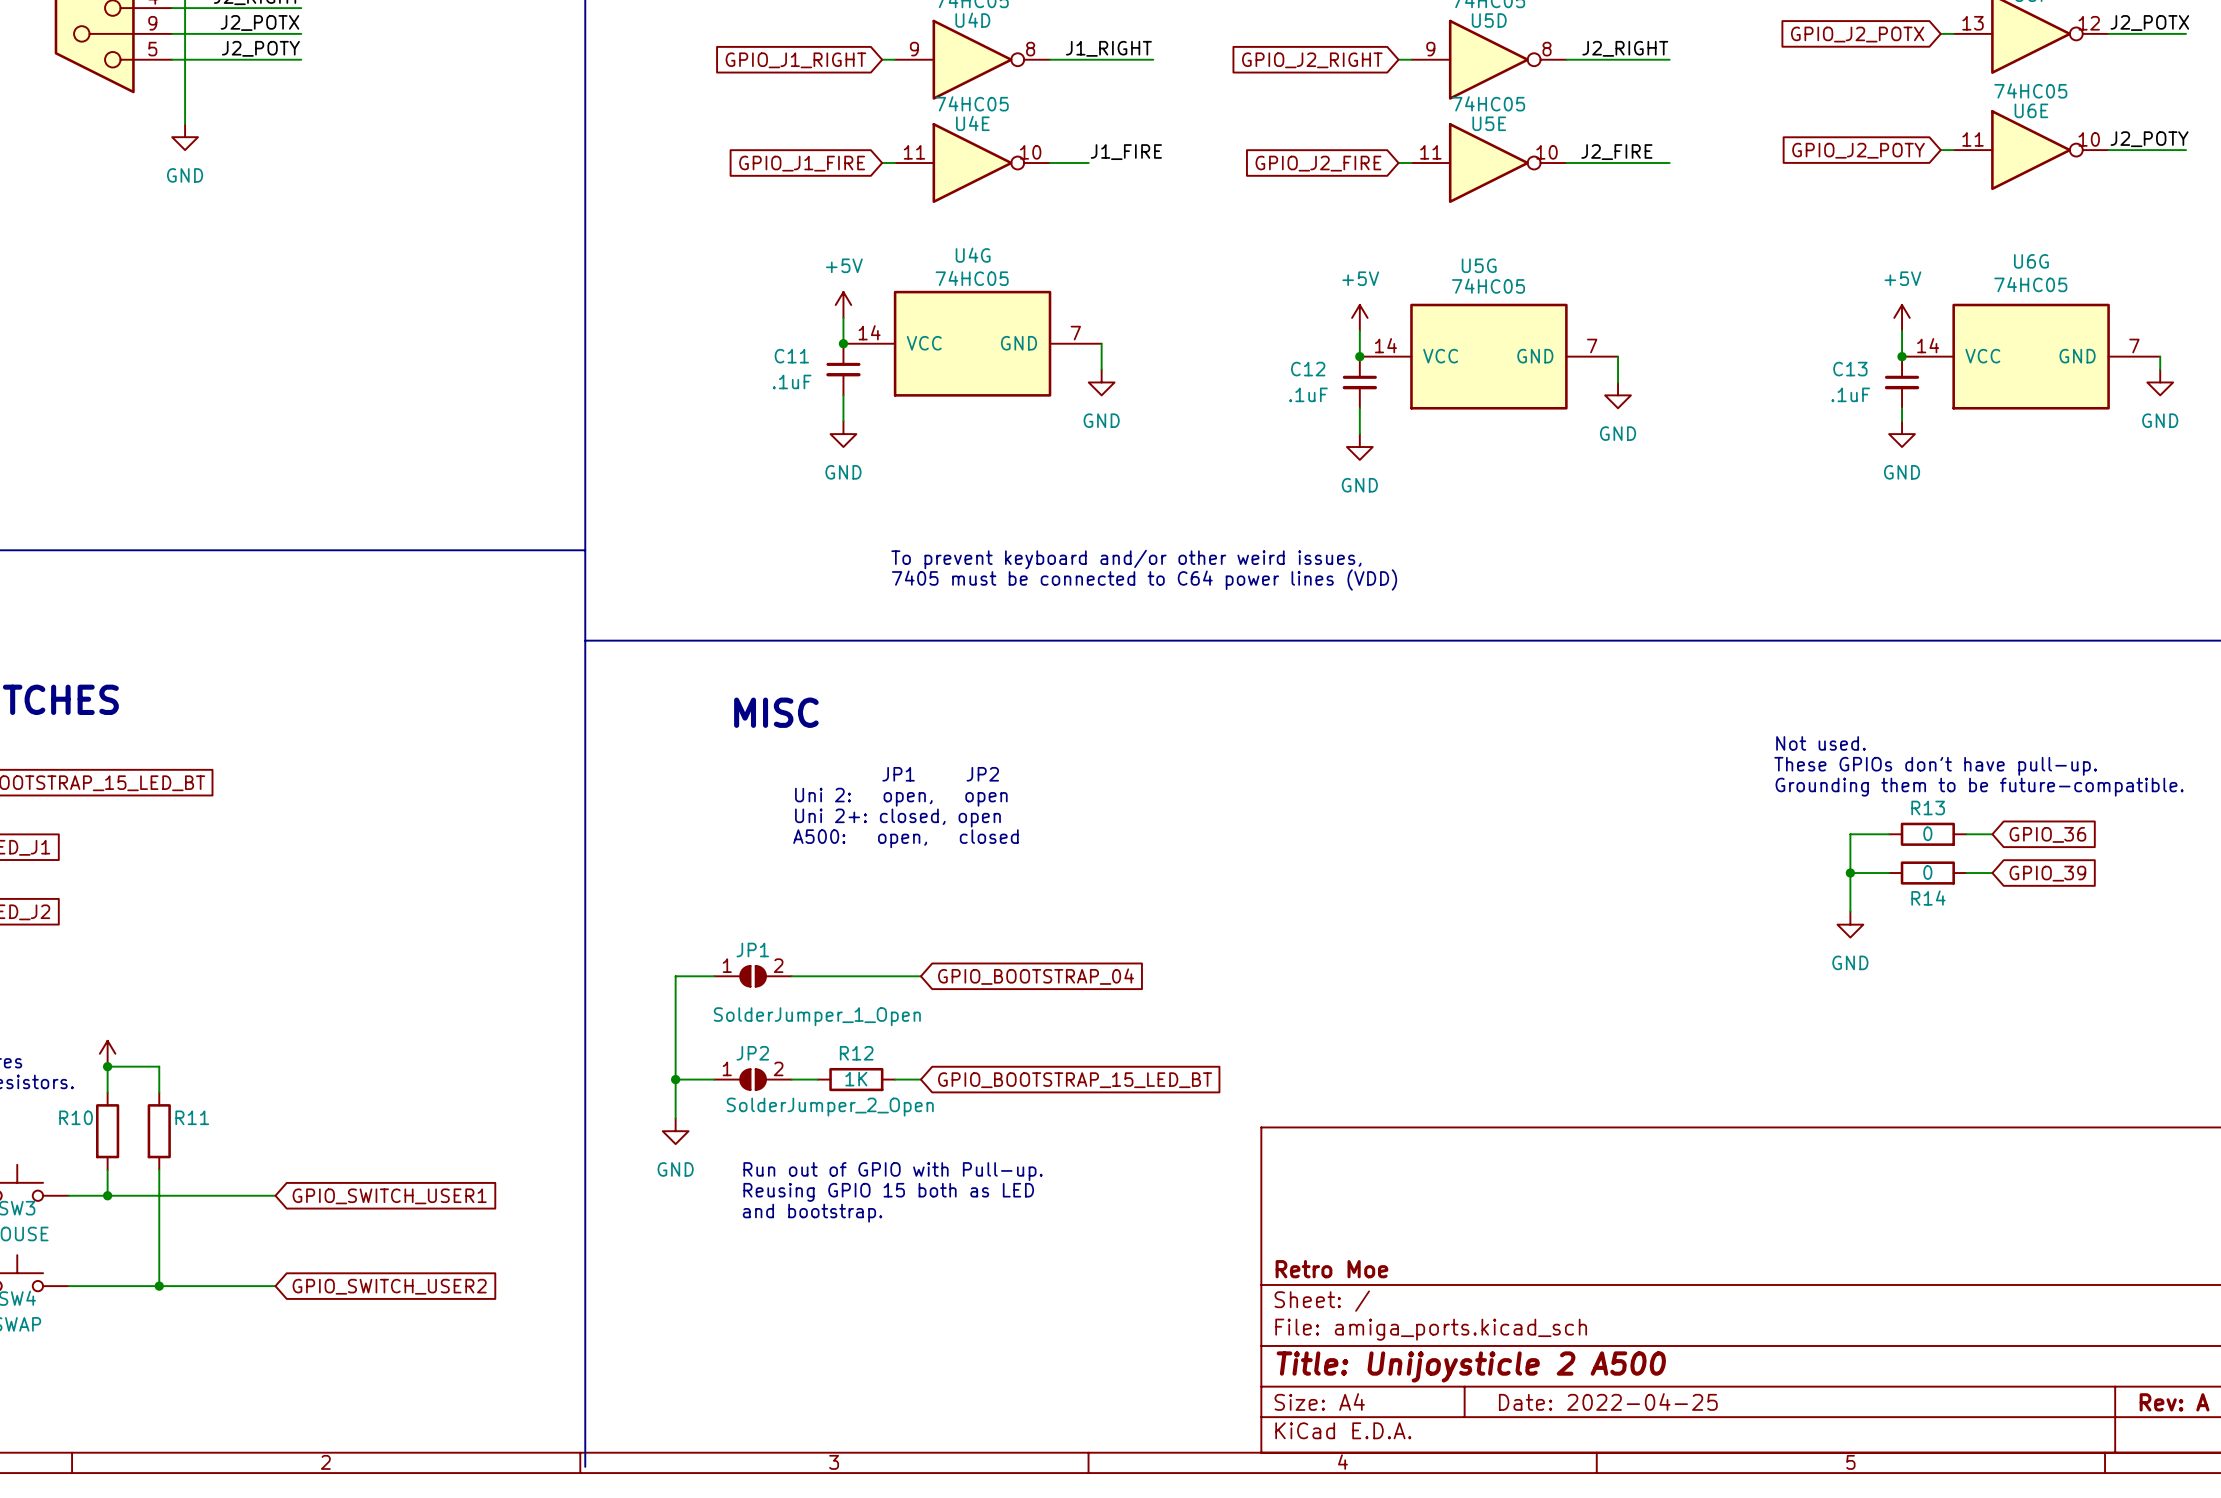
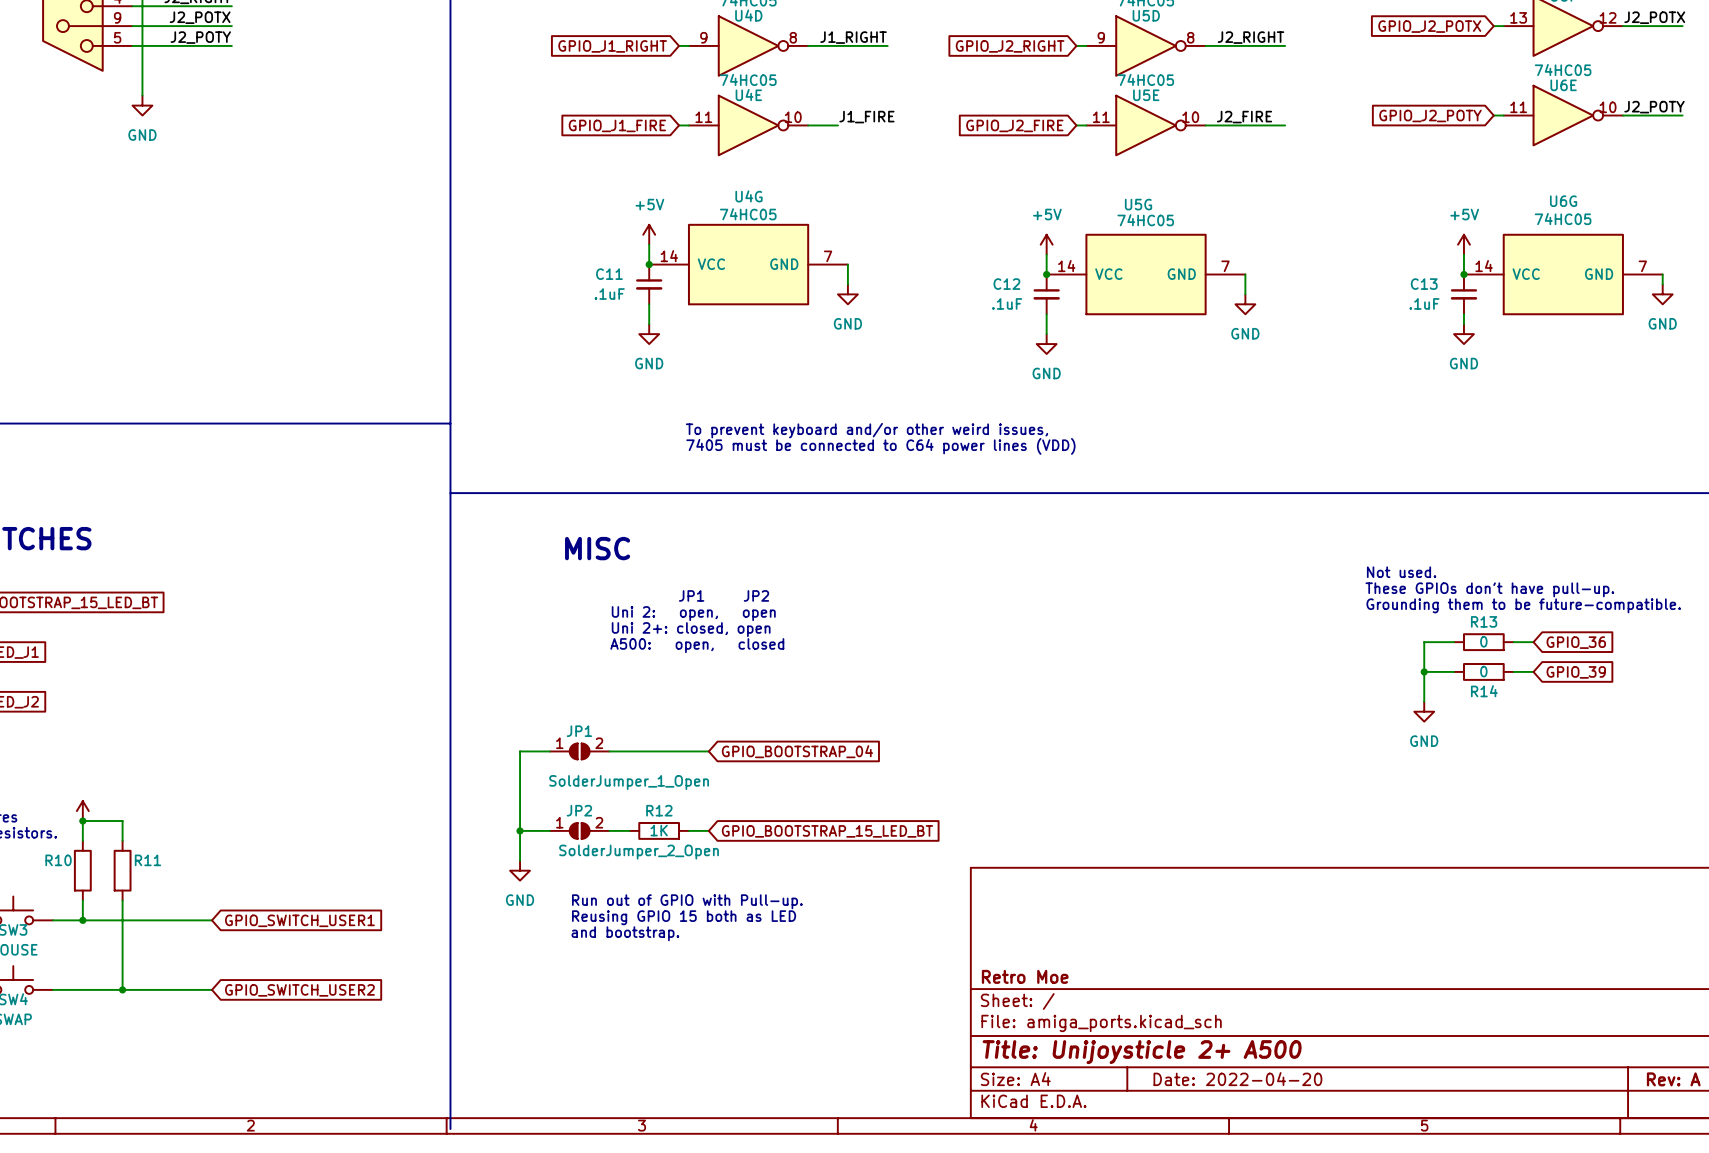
title block: Title: Unijoysticle 2 A500 (1471, 1366) -> Title: Unijoysticle 2+ A500 (1142, 1052)
title block: Date: 2022-04-25 (1608, 1401) -> Date: 2022-04-20 (1237, 1079)

